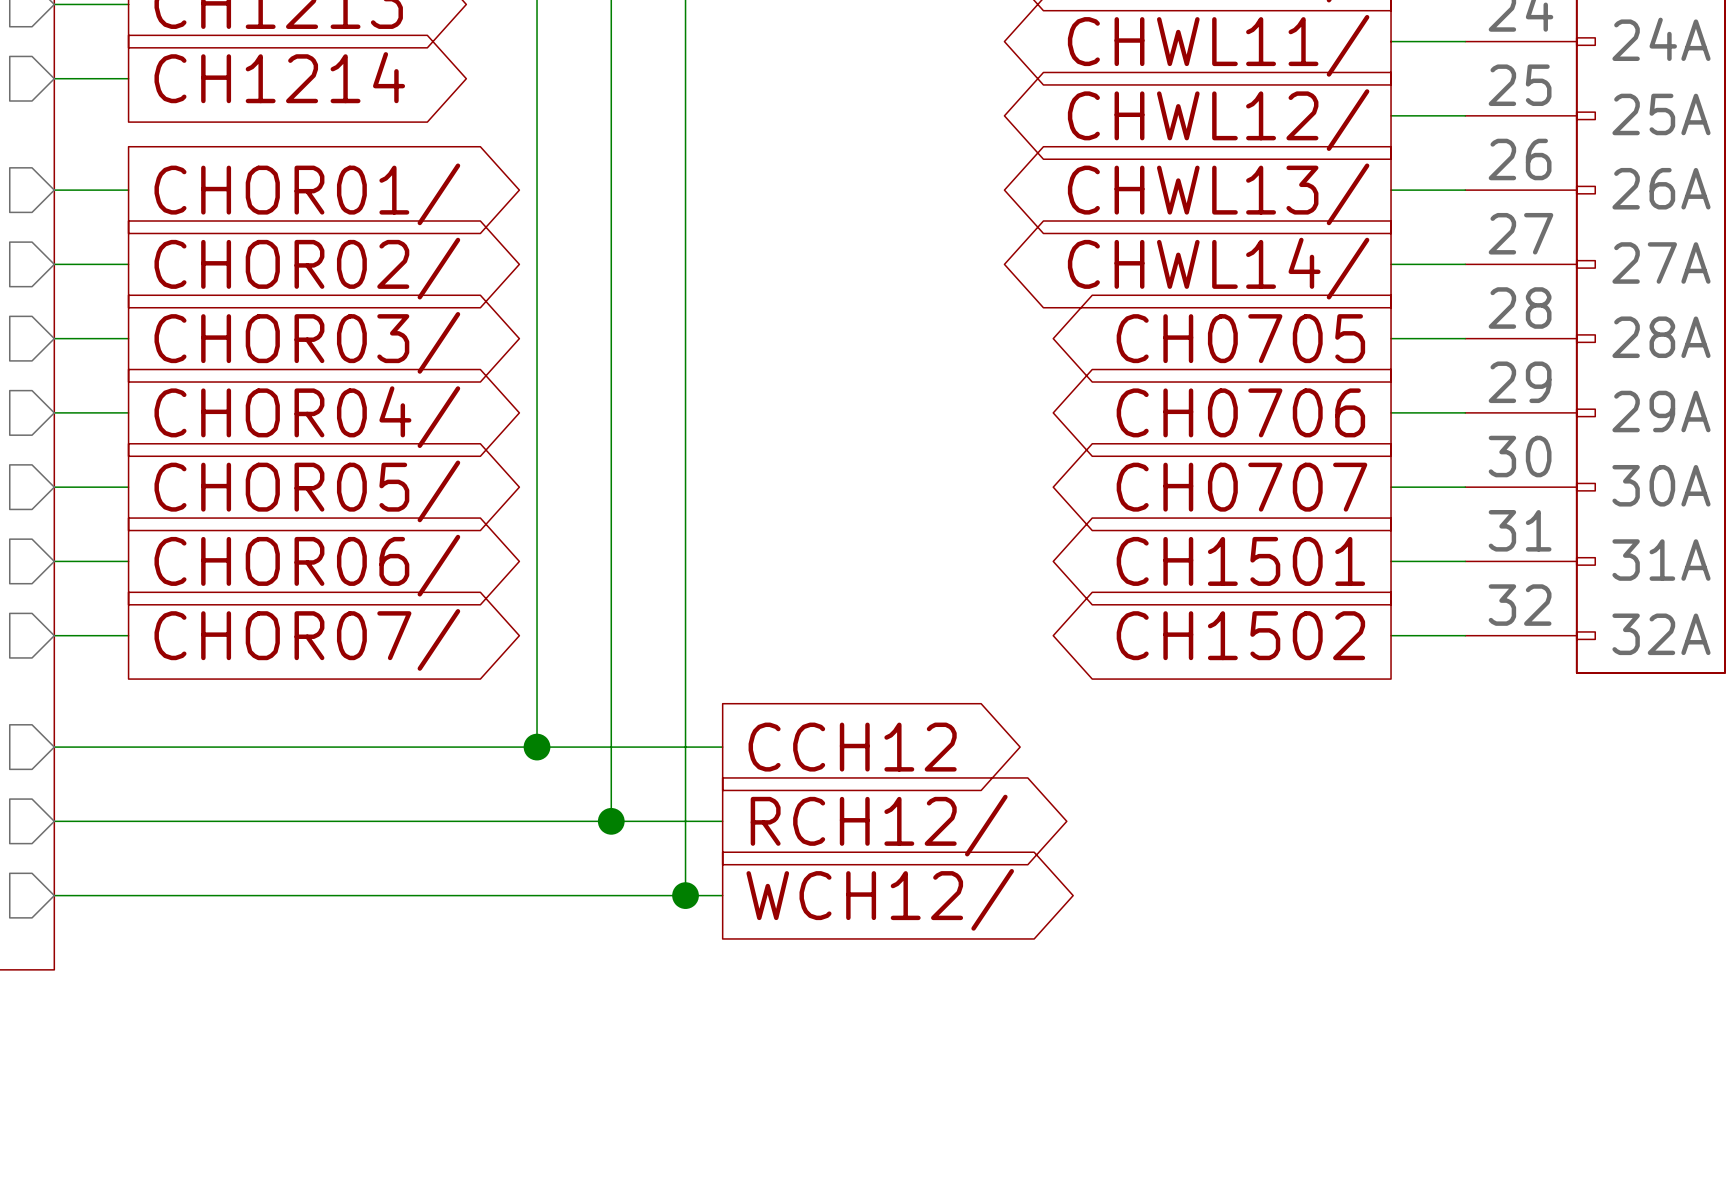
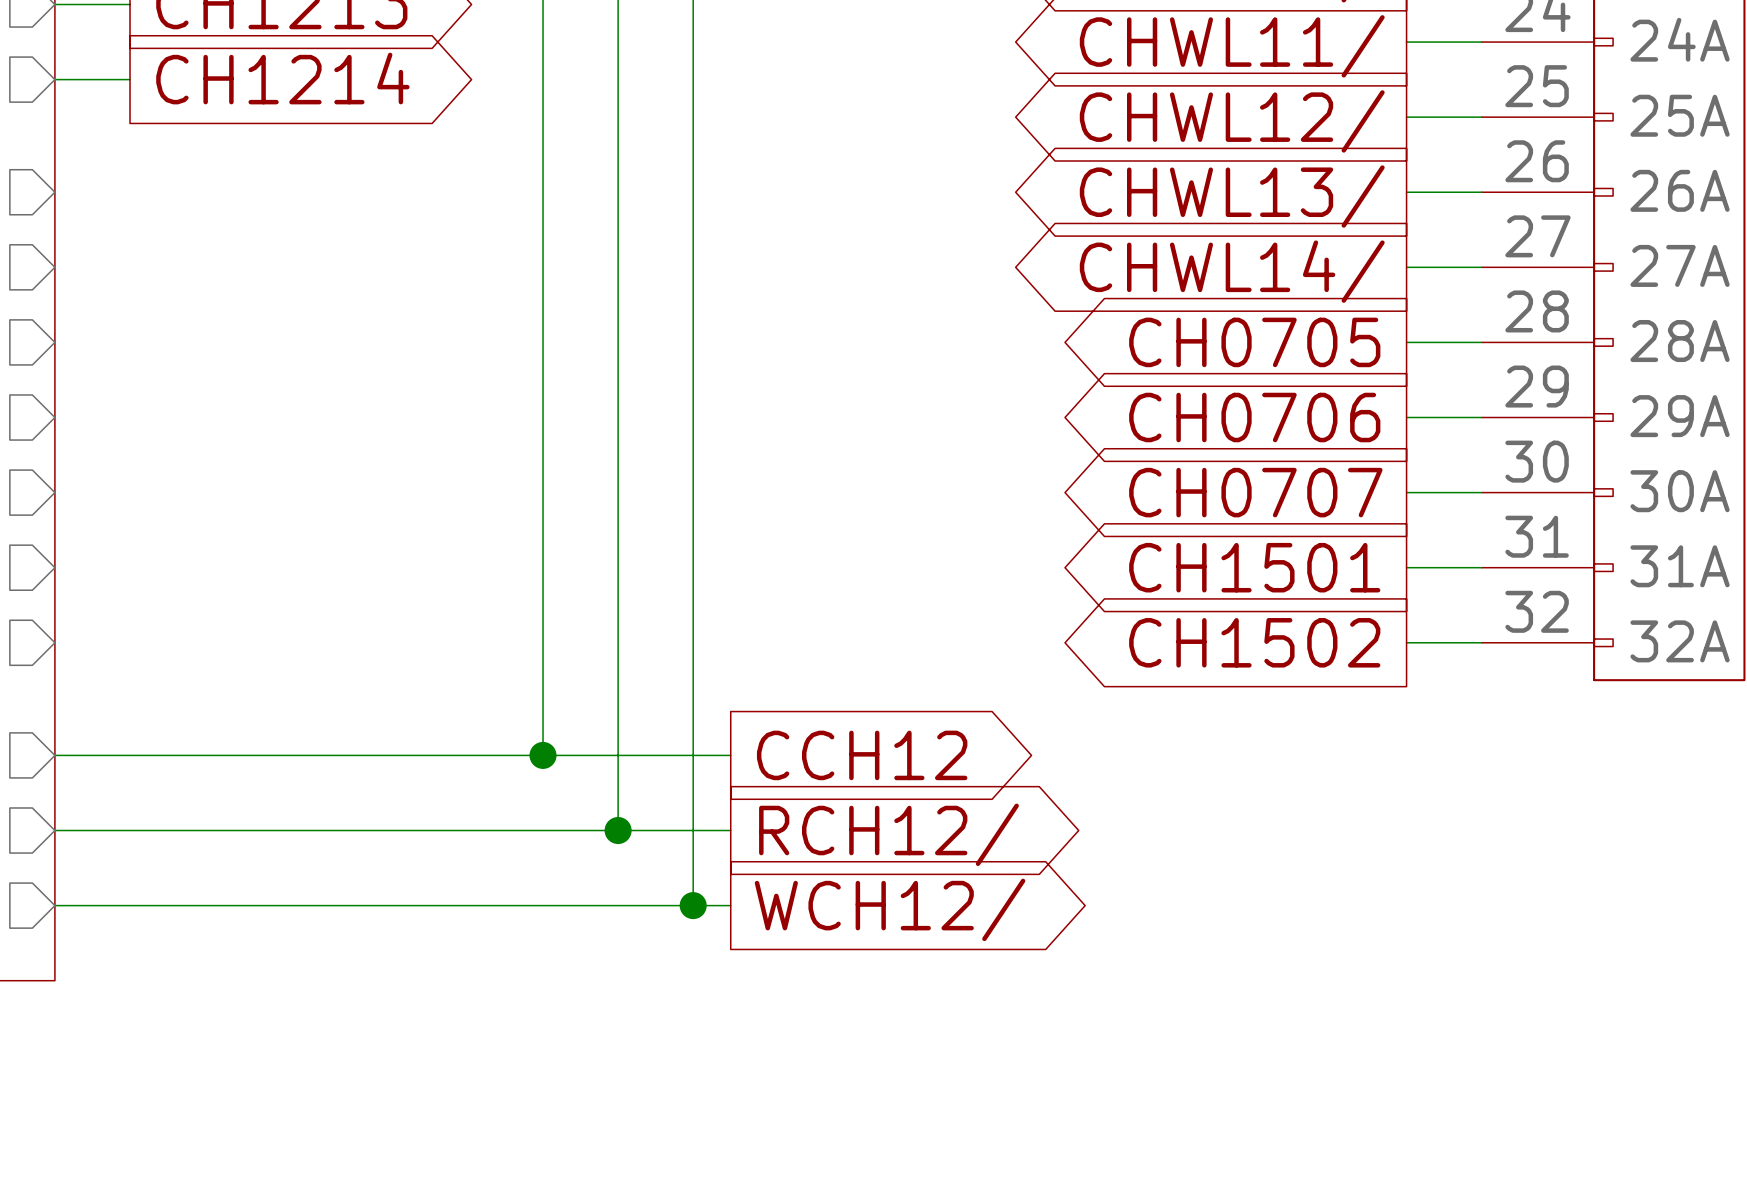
wire: (54, 190) (128, 190) -> none
global label: CHOR01/ (307, 194) -> none
wire: (54, 264) (128, 264) -> none
global label: CHOR02/ (307, 268) -> none
wire: (54, 338) (128, 338) -> none
global label: CHOR03/ (307, 342) -> none
wire: (54, 412) (128, 412) -> none
global label: CHOR04/ (307, 417) -> none
wire: (54, 487) (128, 487) -> none
global label: CHOR05/ (307, 491) -> none
wire: (54, 561) (128, 561) -> none
global label: CHOR06/ (307, 565) -> none
wire: (54, 635) (128, 635) -> none
global label: CHOR07/ (307, 639) -> none

